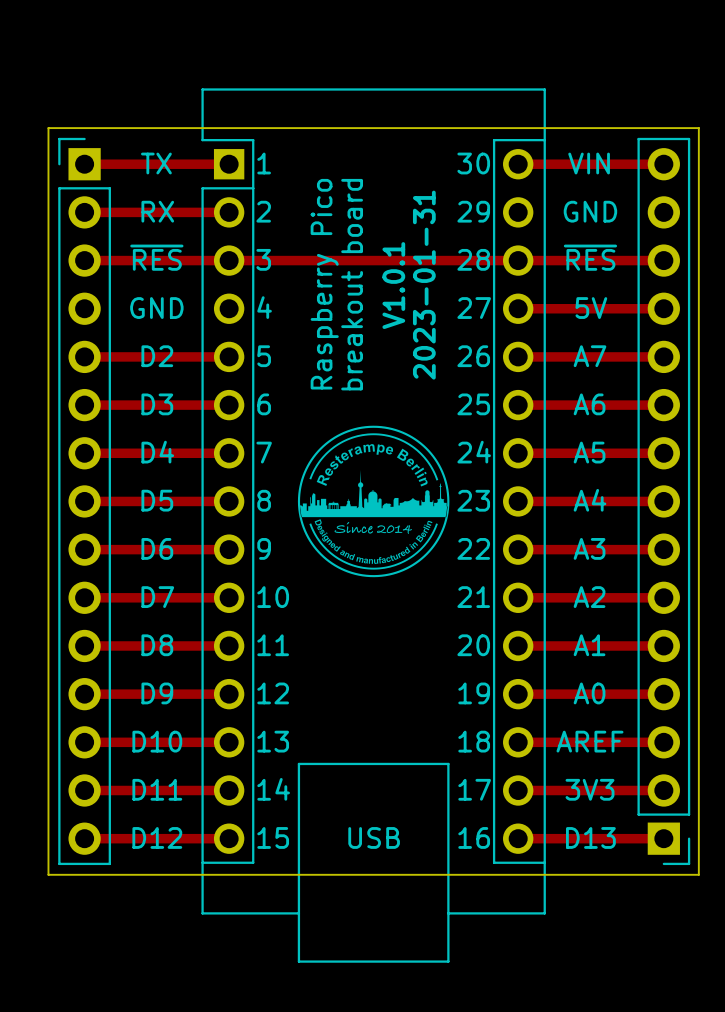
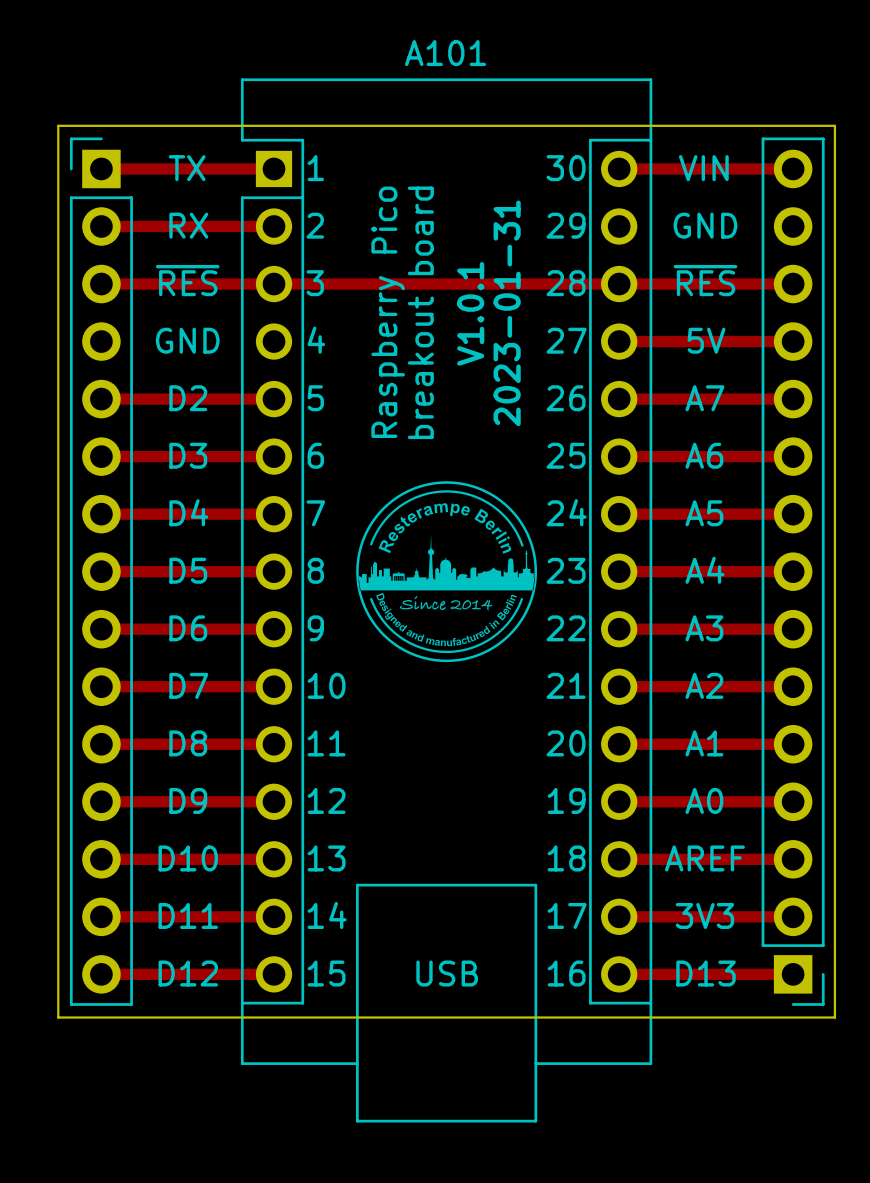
A101 name: none -> A101 (445, 53)

